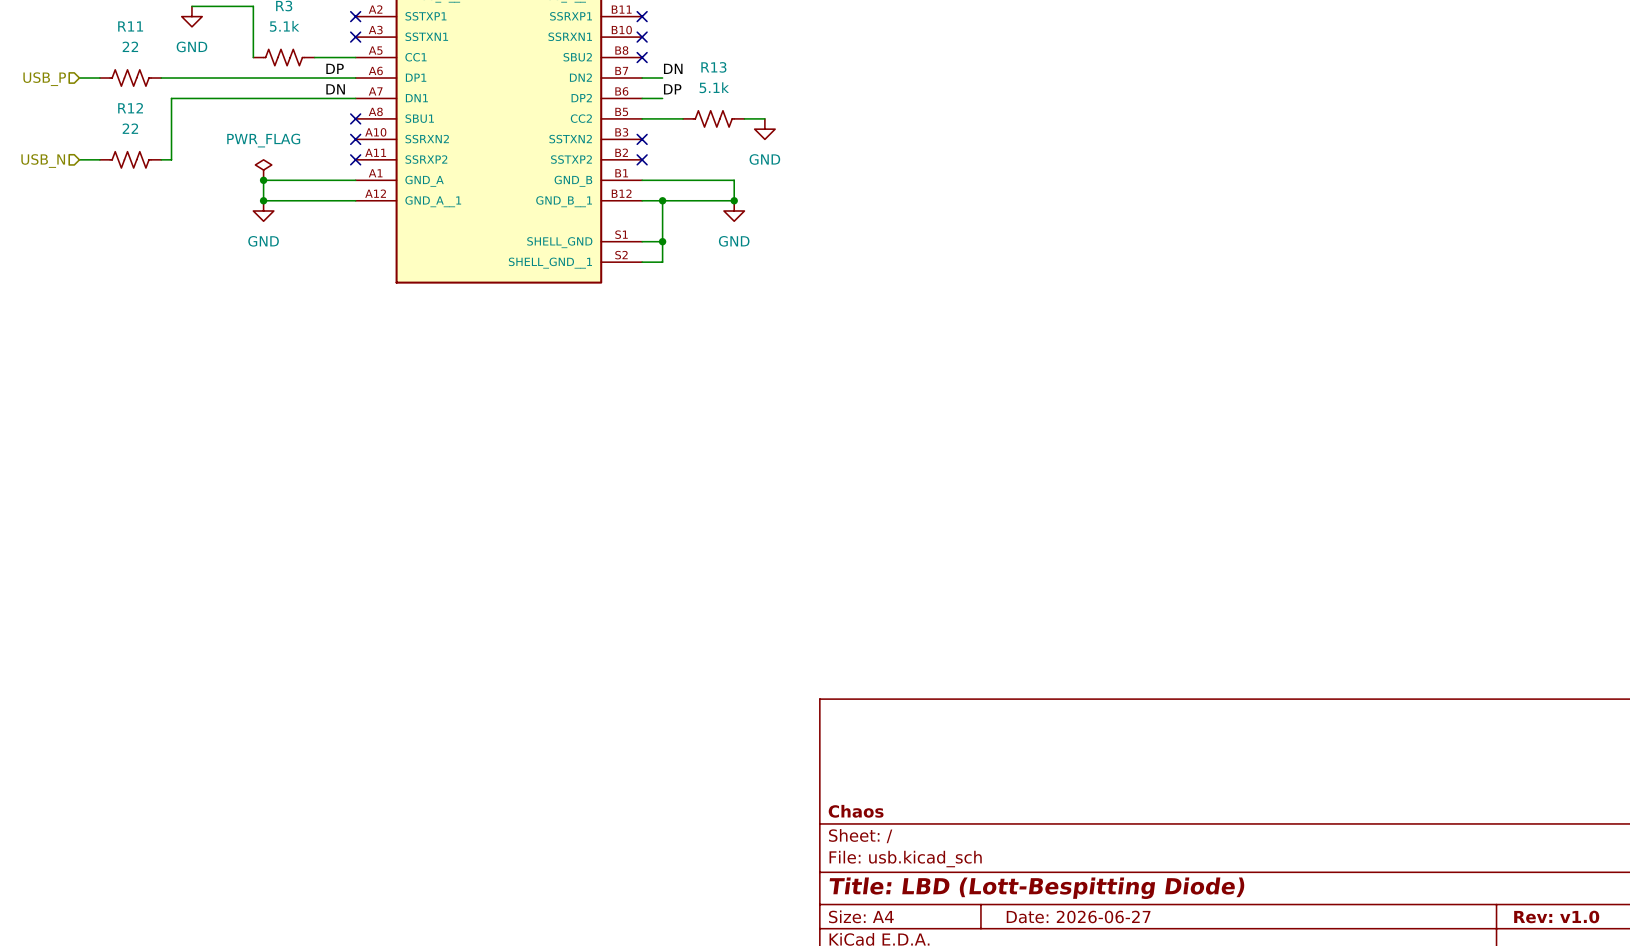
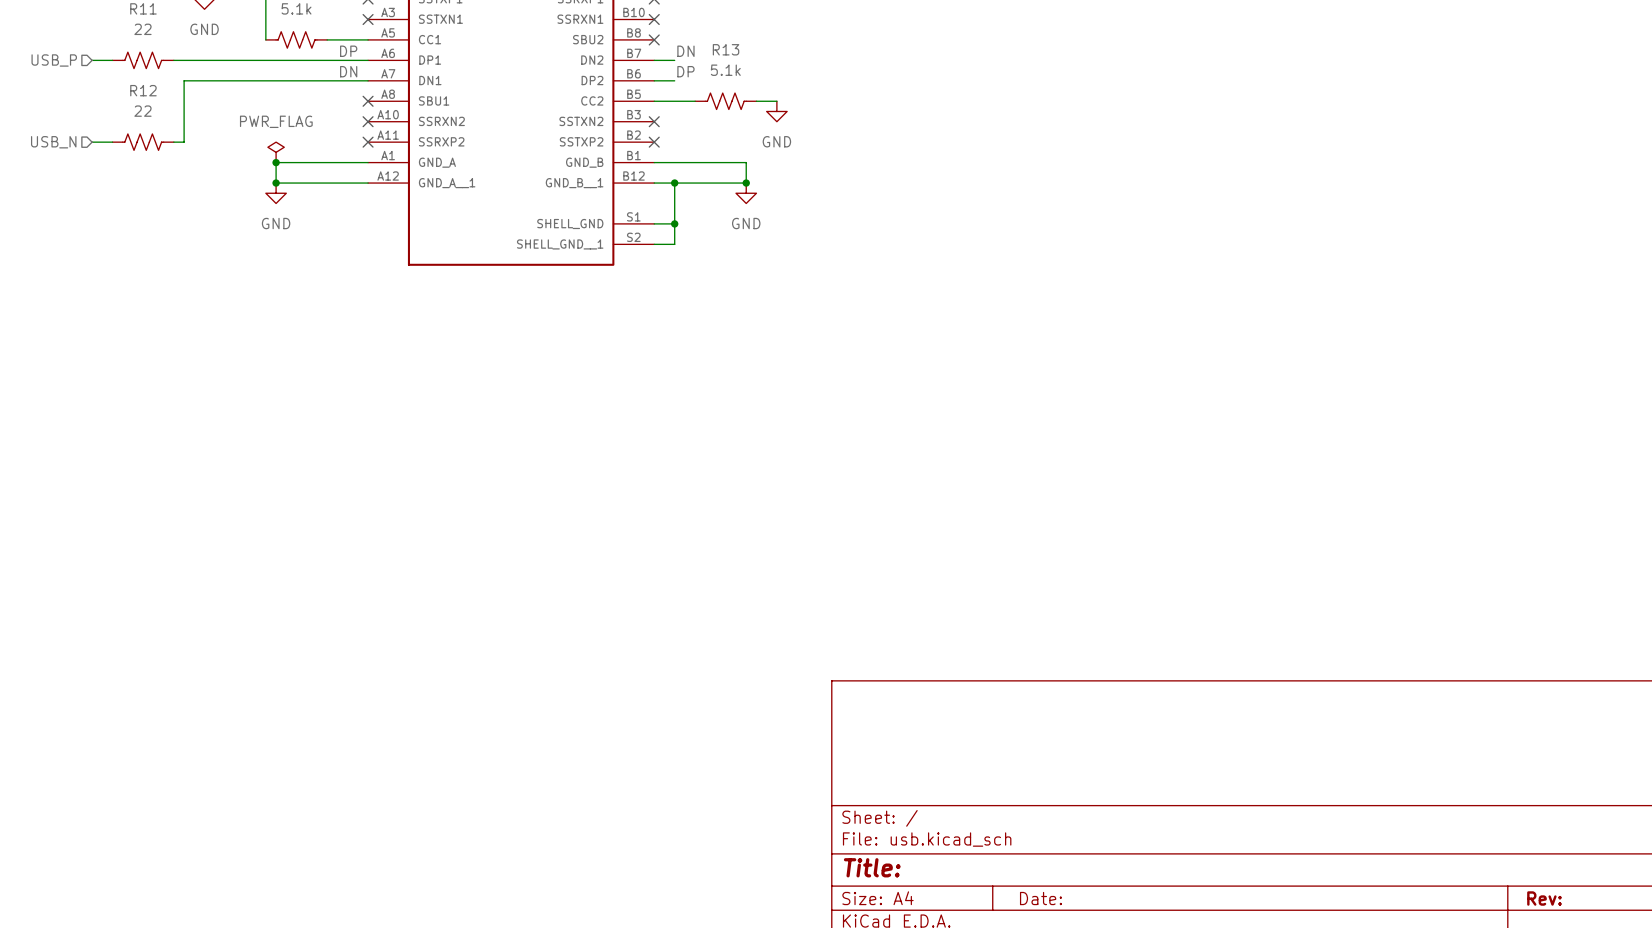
title block: Chaos (856, 811) -> none
title block: Title: LBD (Lott-Bespitting Diode) (1037, 888) -> Title: (872, 867)
title block: Date: 2026-06-27 (1078, 916) -> Date: (1040, 898)
title block: Rev: v1.0 (1556, 916) -> Rev: (1544, 898)

